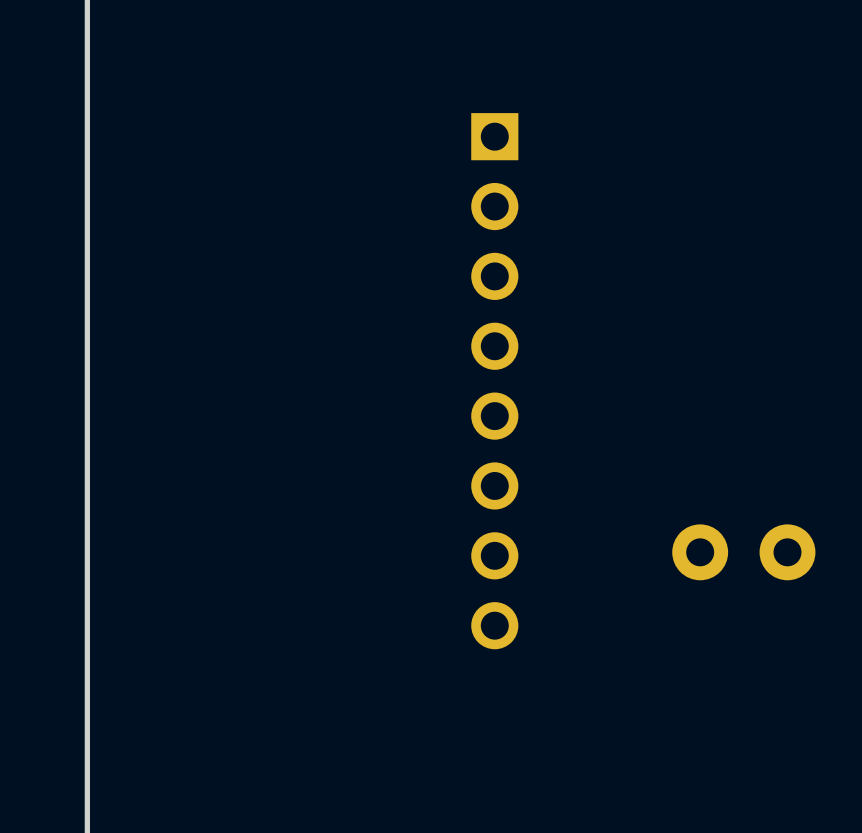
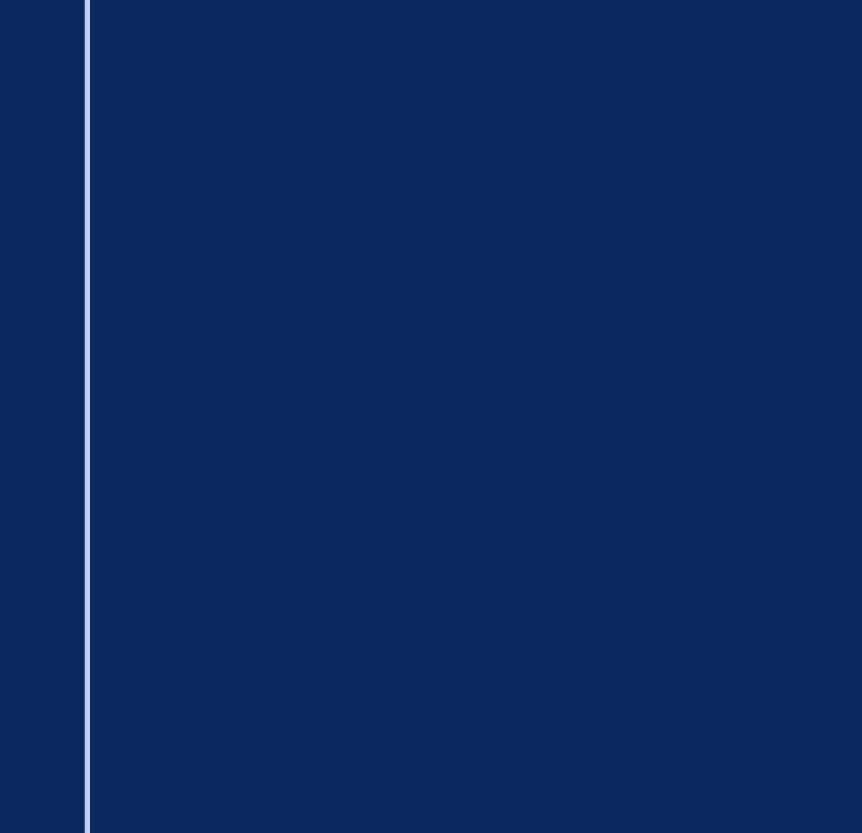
part: (494, 381) -> none
part: (743, 552) -> none

